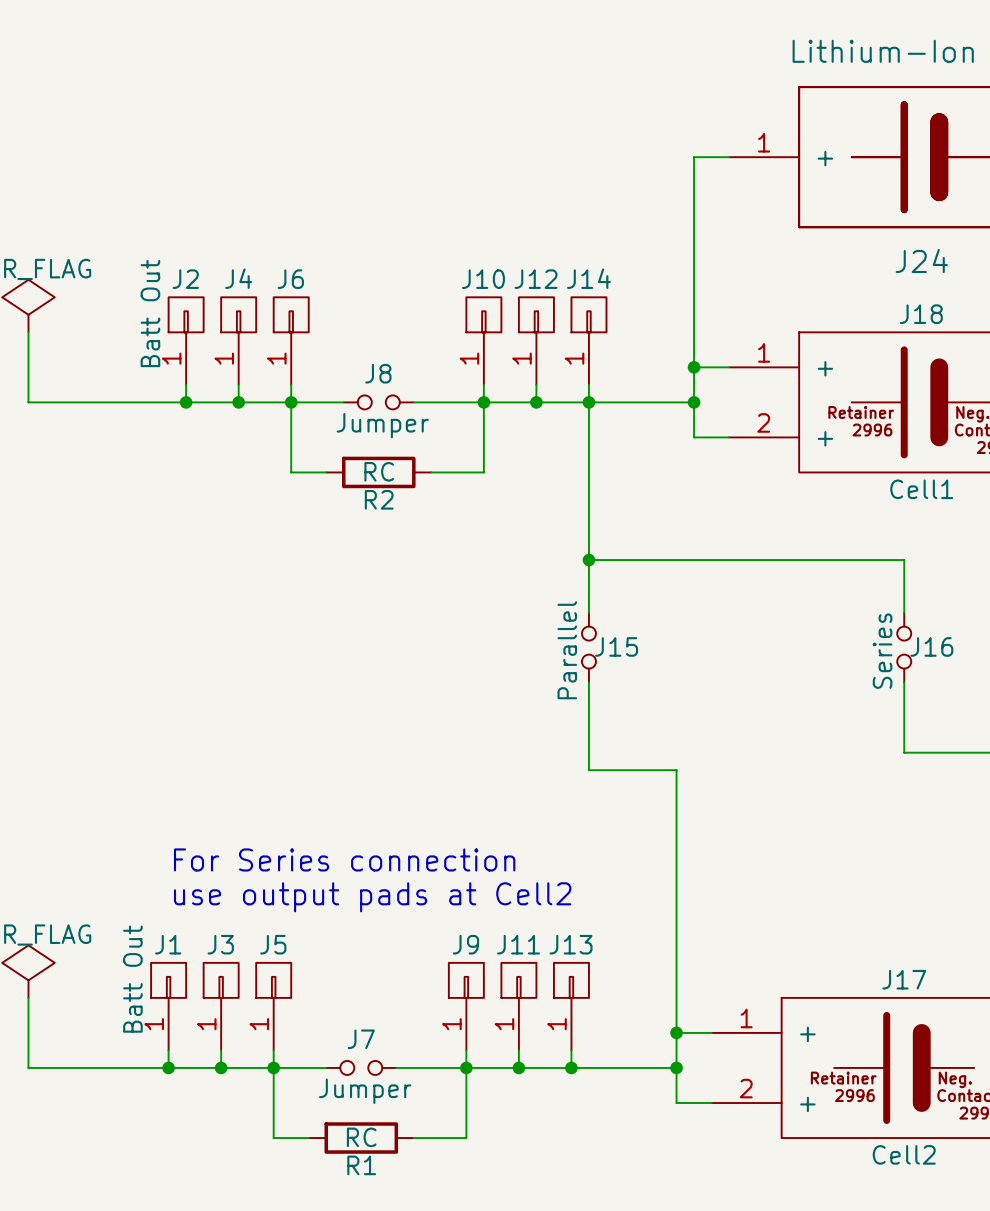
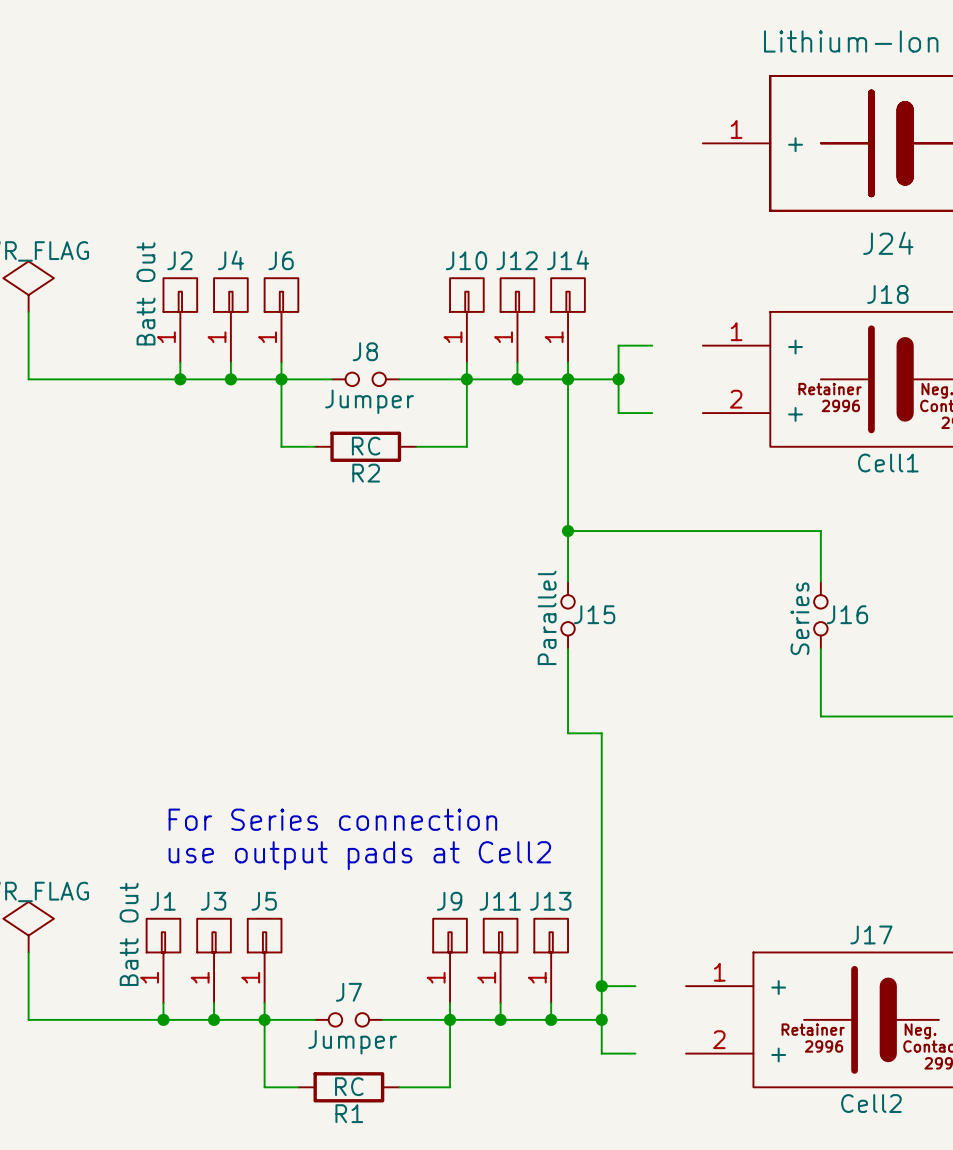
wire: (729, 157) (694, 157) (694, 437) (729, 437) -> none
wire: none -> (652, 345) (618, 345) (618, 413) (652, 413)
wire: (694, 367) (729, 367) -> none
junction: (694, 367) -> none
wire: (641, 402) (694, 402) -> none
junction: none -> (618, 379)
junction: (694, 402) -> none
wire: (851, 560) (904, 560) (904, 612) -> (820, 531) (820, 581)
J16 position: (904, 647) -> (820, 615)
wire: (904, 682) (904, 752) -> (820, 649) (820, 716) (871, 716)
wire: (623, 770) (676, 770) (676, 1102) (711, 1102) -> (601, 733) (601, 1053) (635, 1053)
junction: none -> (601, 986)
wire: (676, 1032) (711, 1032) -> (601, 986) (635, 986)
junction: (676, 1032) -> none
wire: (623, 1067) (676, 1067) -> none
junction: none -> (601, 1019)
junction: (676, 1067) -> none

